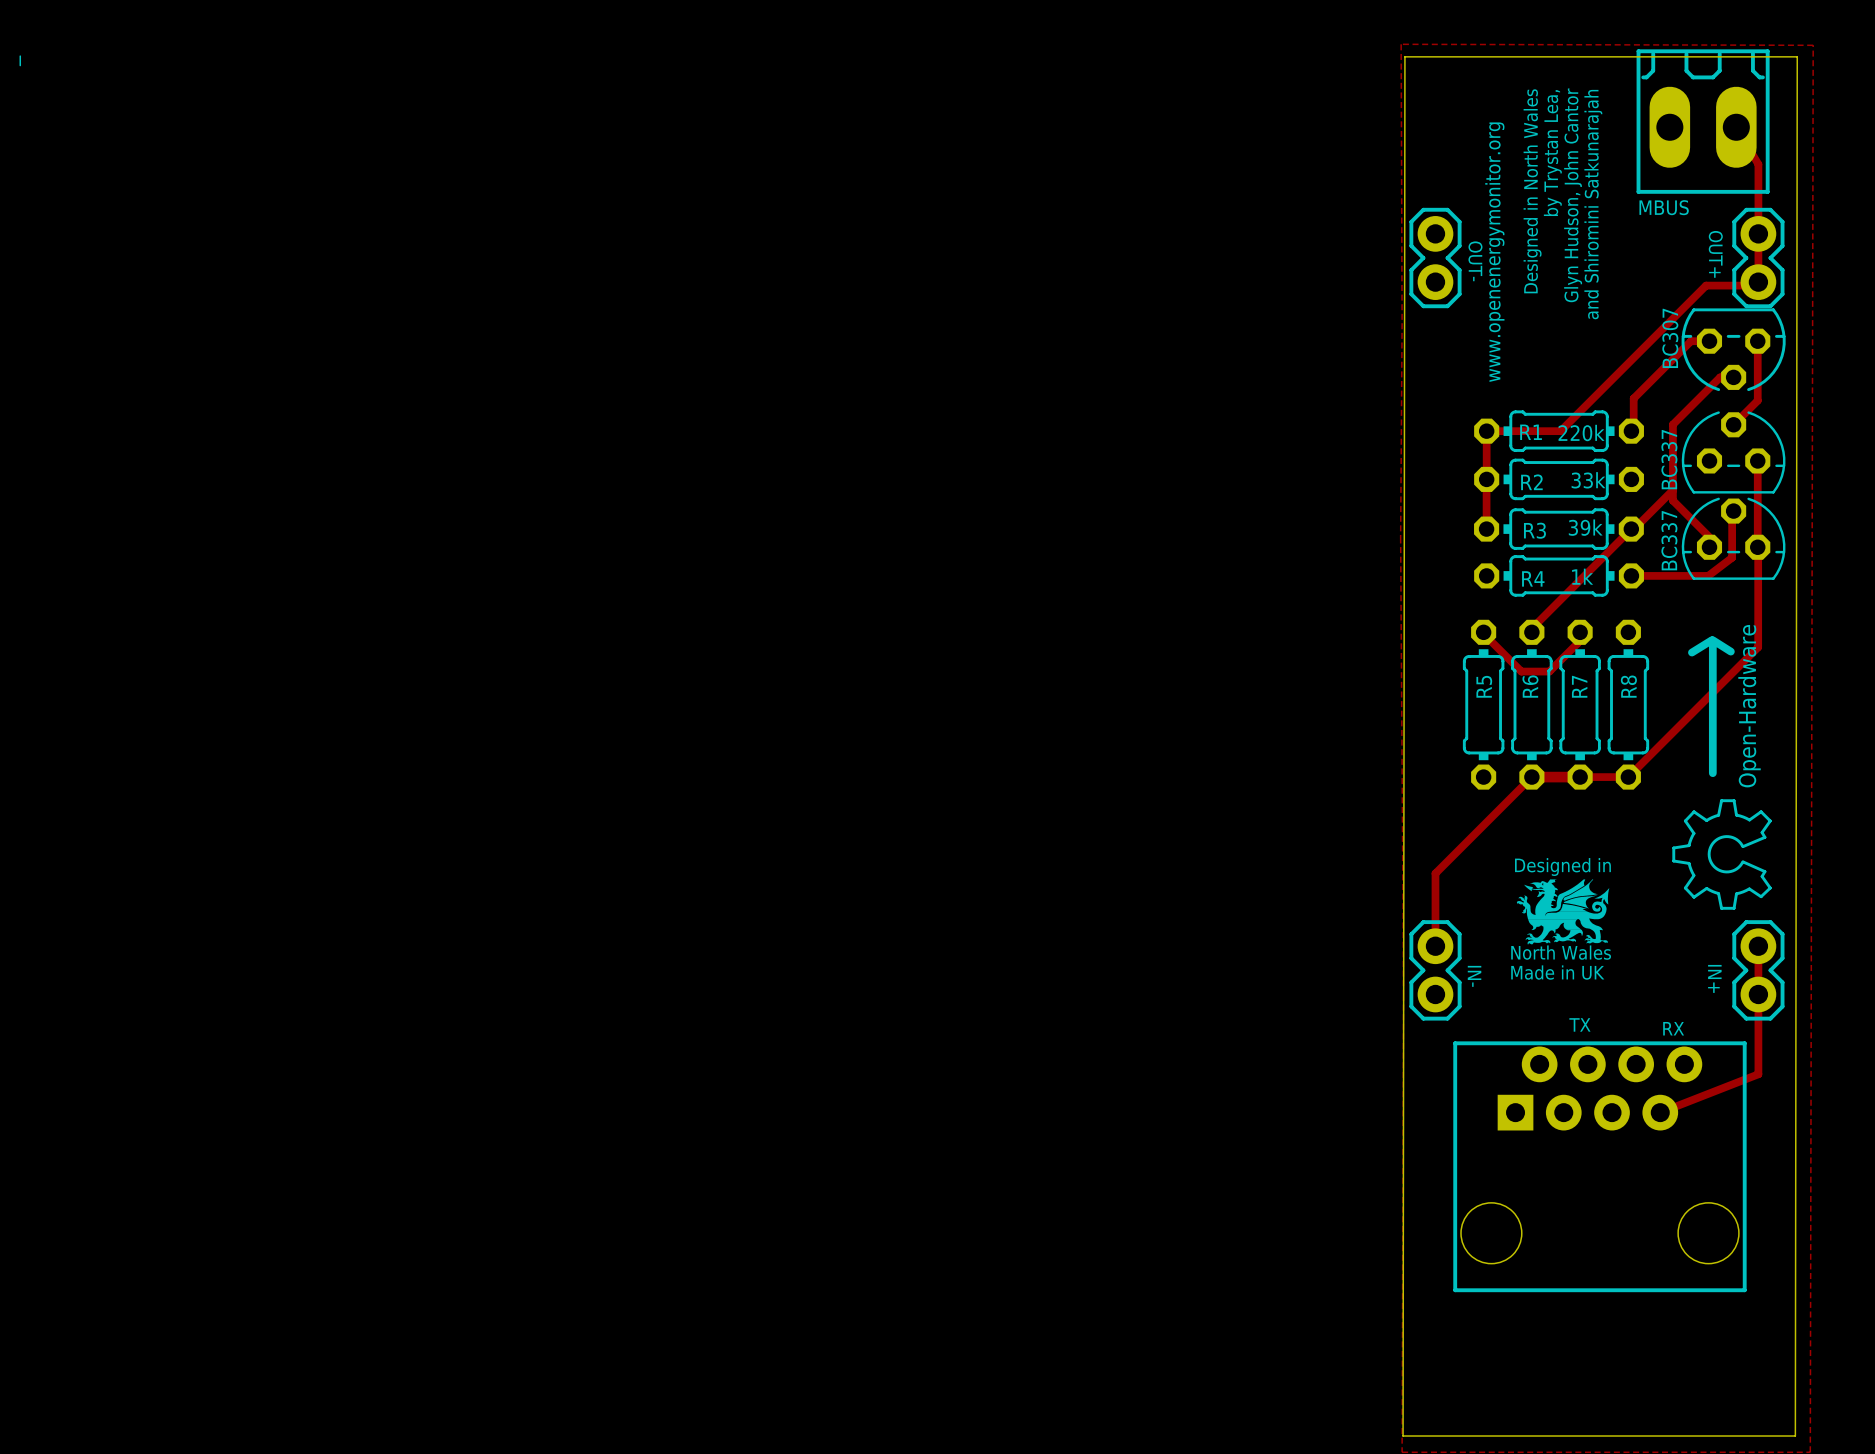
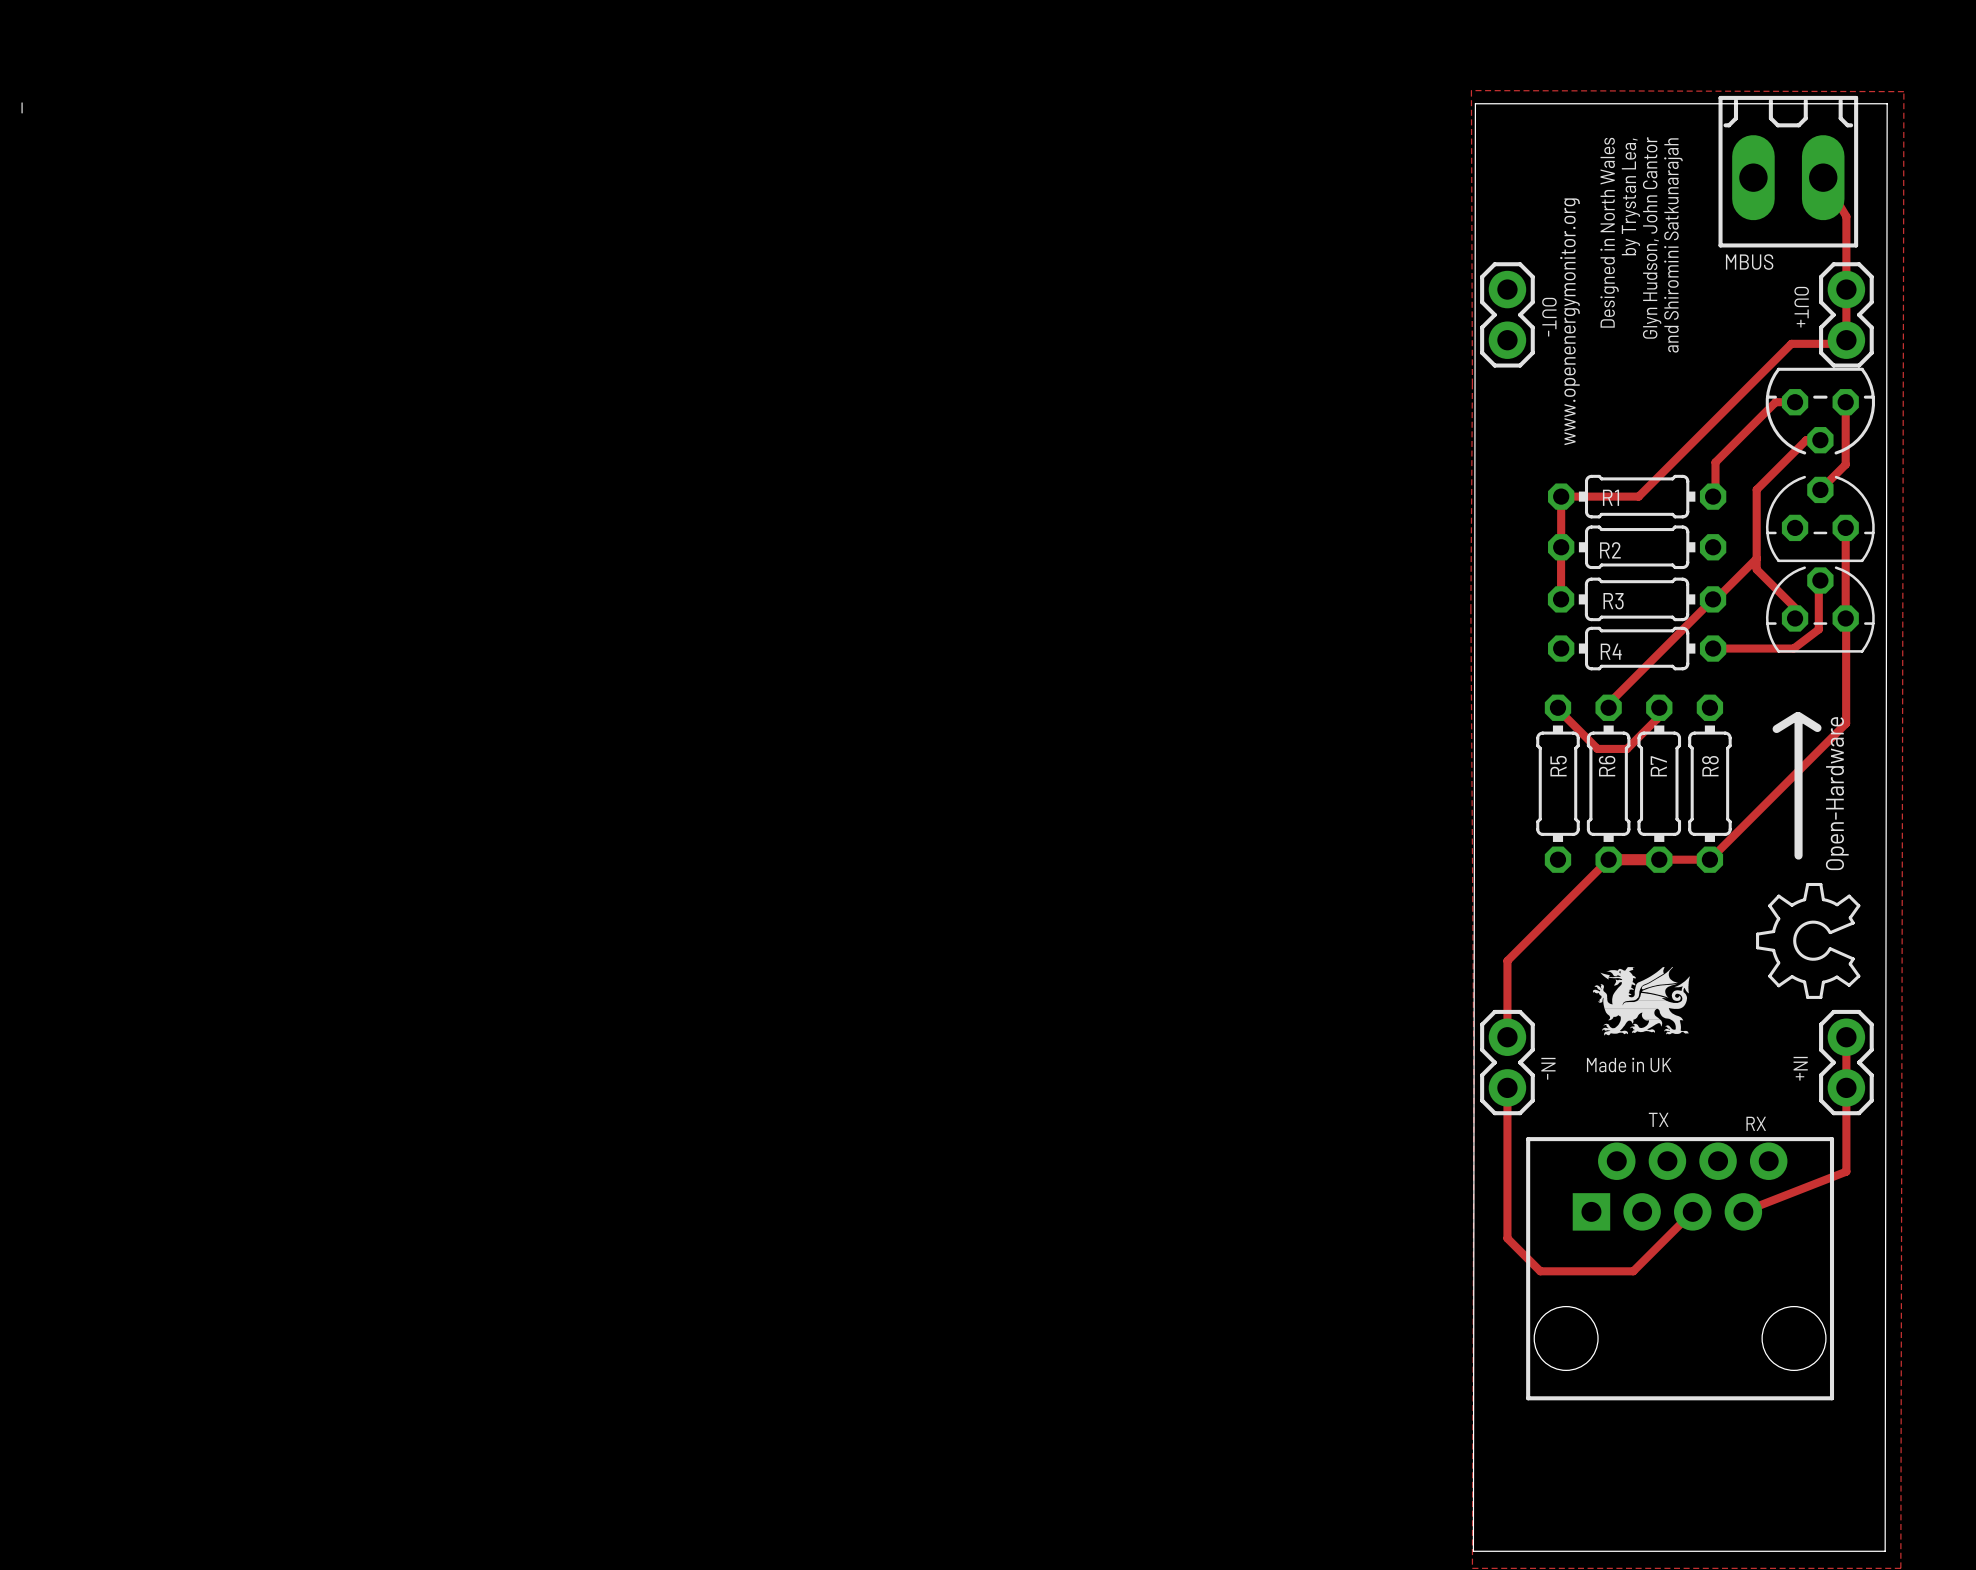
part value: BC307 (1670, 338) -> none
R1 value: 220k (1581, 433) -> none
part value: BC337 (1669, 459) -> none
R2 value: 33k (1588, 480) -> none
R3 value: 39k (1585, 527) -> none
part value: BC337 (1669, 540) -> none
R4 value: 1k (1582, 576) -> none
text: Designed in (1562, 867) -> none
text: North Wales (1561, 952) -> none
track: none -> (1507, 1087) (1507, 1238) (1540, 1271) (1633, 1271) (1692, 1211)

